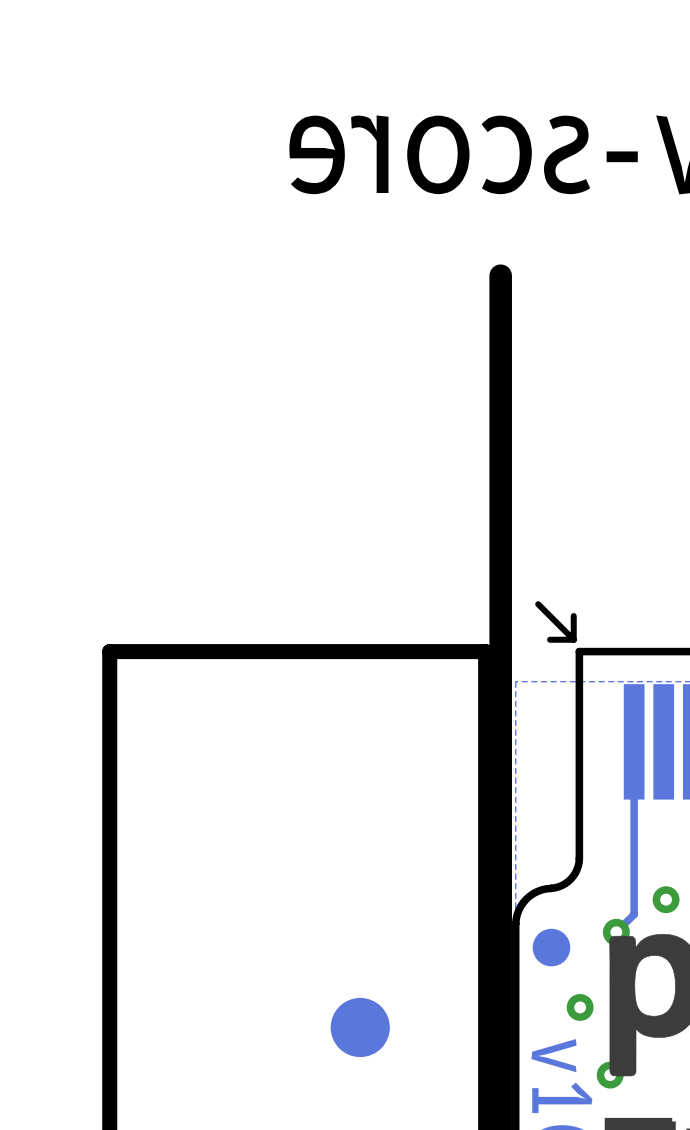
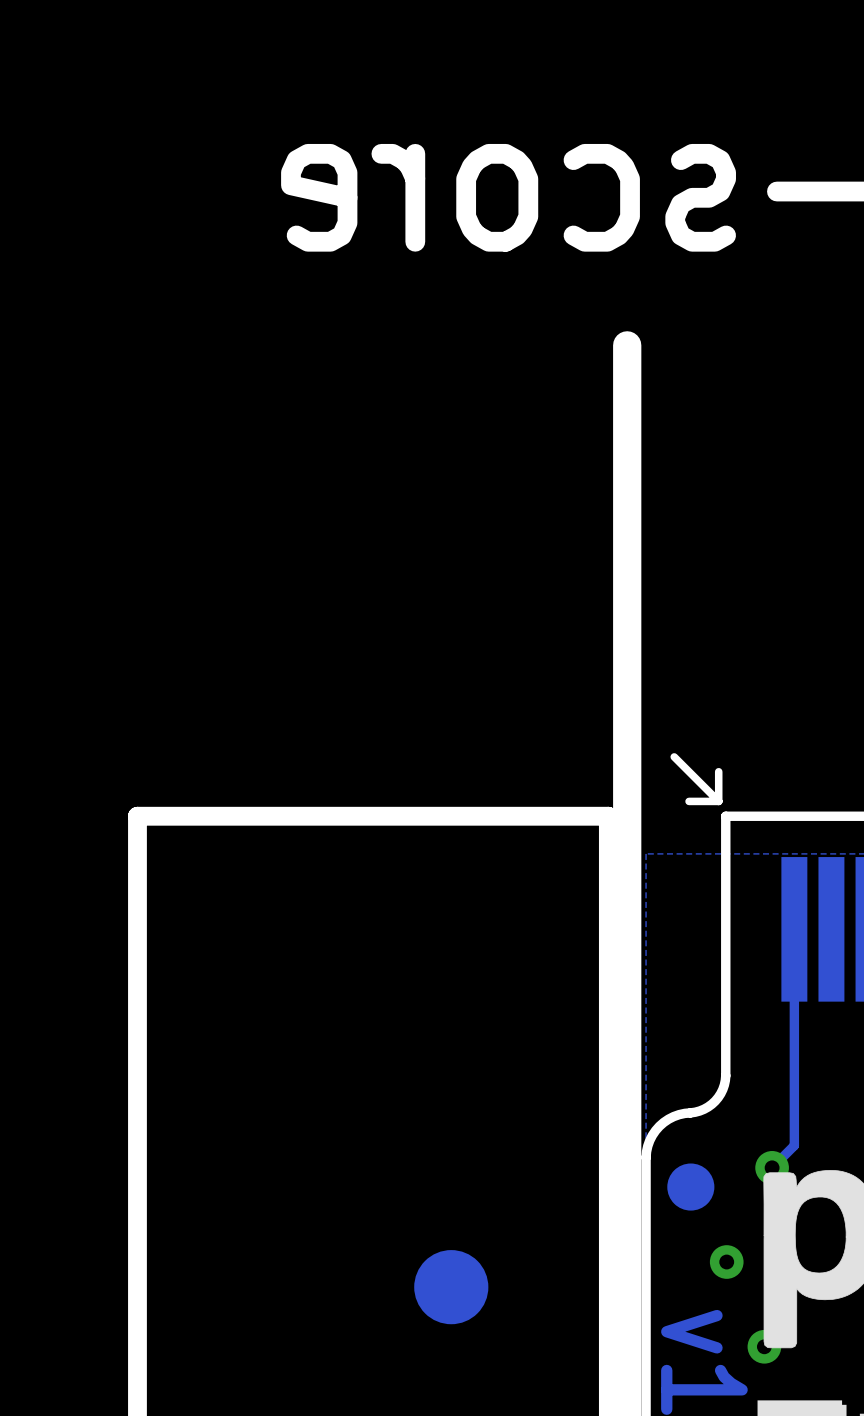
via: (666, 899) -> none

